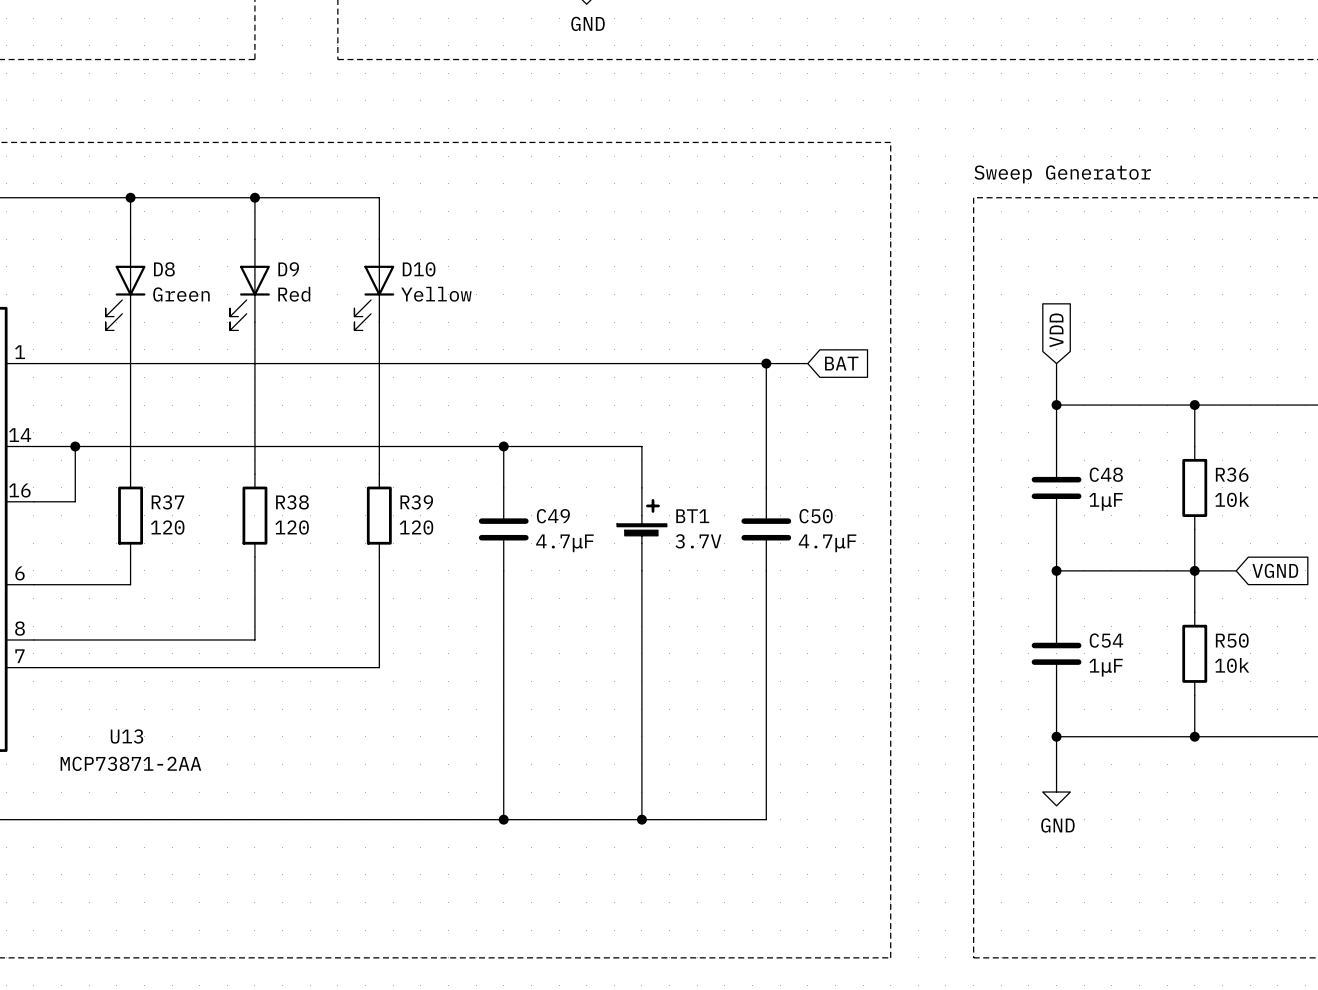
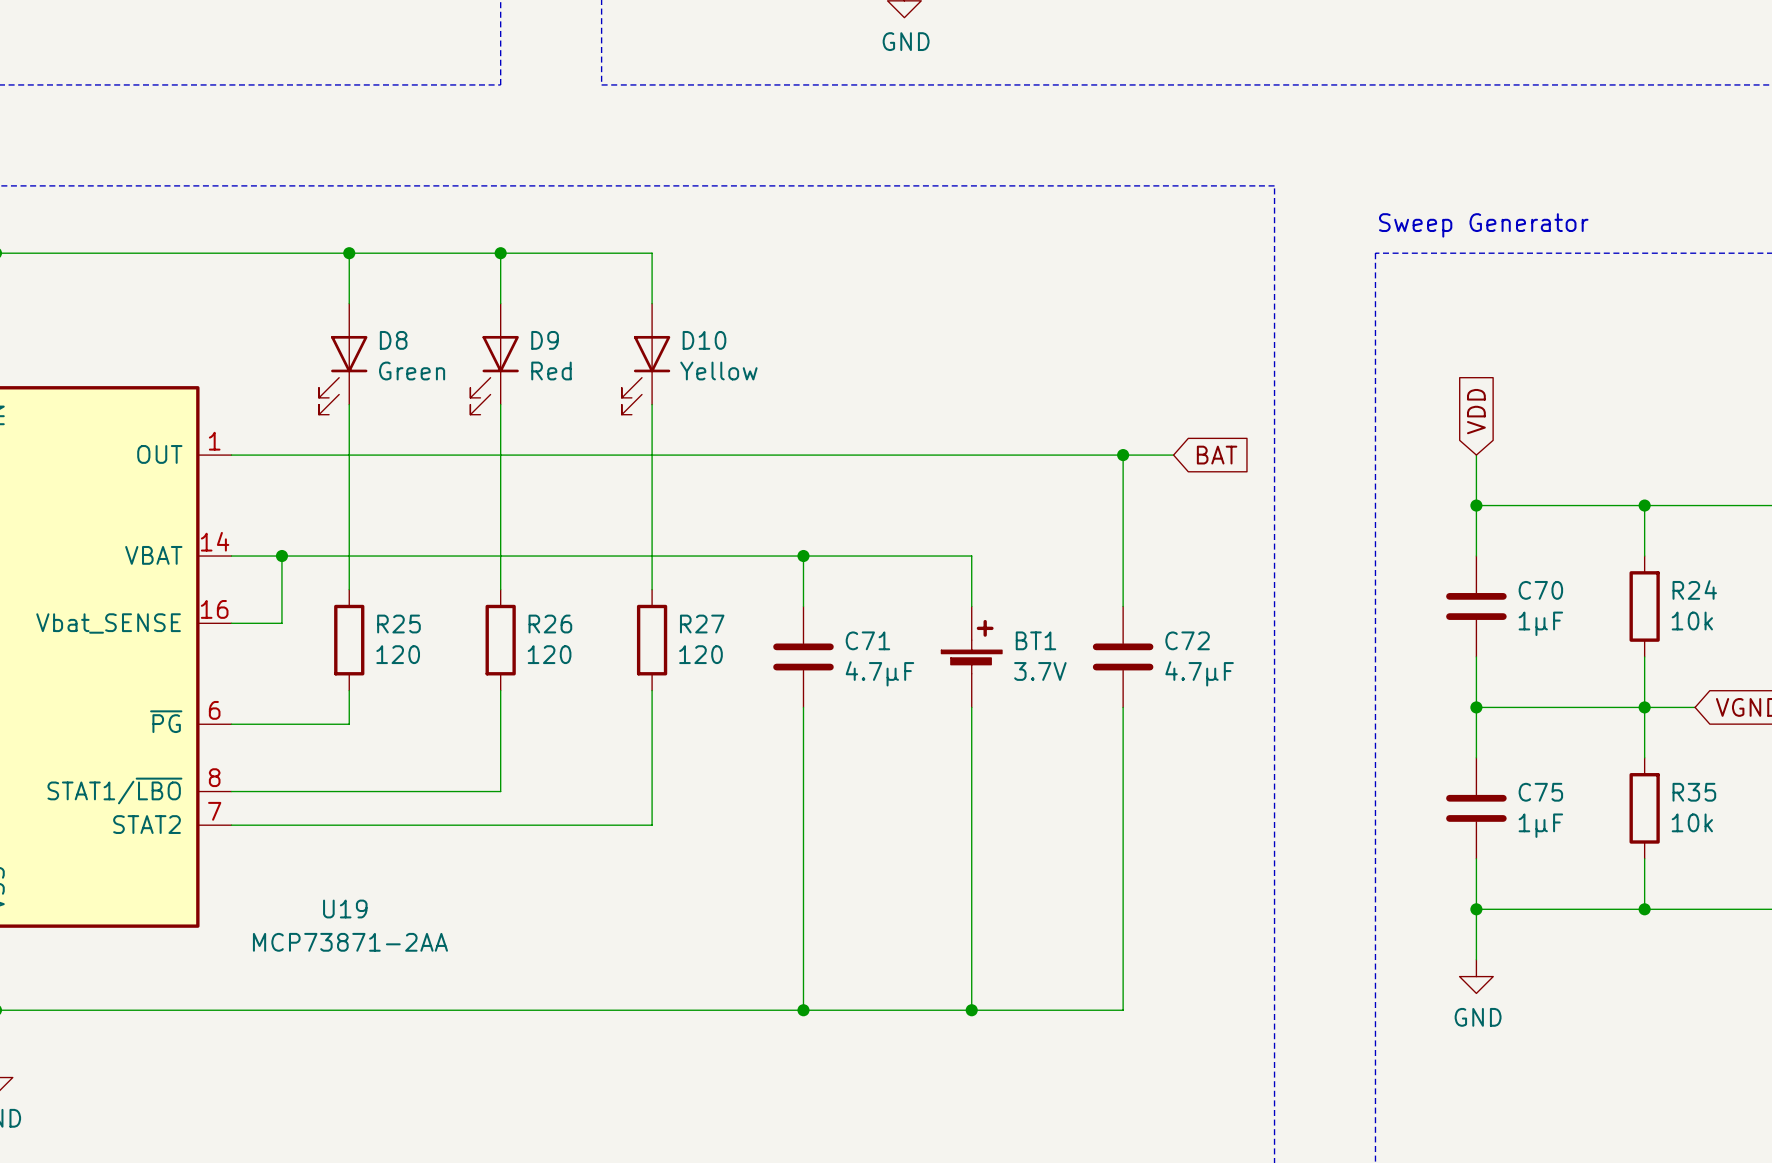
C48 name: C48 (1106, 474) -> C70 (1540, 590)
R36 name: R36 (1232, 474) -> R24 (1694, 589)
R37 name: R37 (167, 502) -> R25 (398, 624)
R38 name: R38 (292, 502) -> R26 (550, 624)
R39 name: R39 (416, 502) -> R27 (702, 624)
C49 name: C49 (553, 516) -> C71 (867, 640)
C50 name: C50 (816, 516) -> C72 (1187, 640)
C54 name: C54 (1106, 640) -> C75 (1540, 792)
R50 name: R50 (1232, 640) -> R35 (1694, 792)
U13 name: U13 (126, 736) -> U19 (345, 909)

